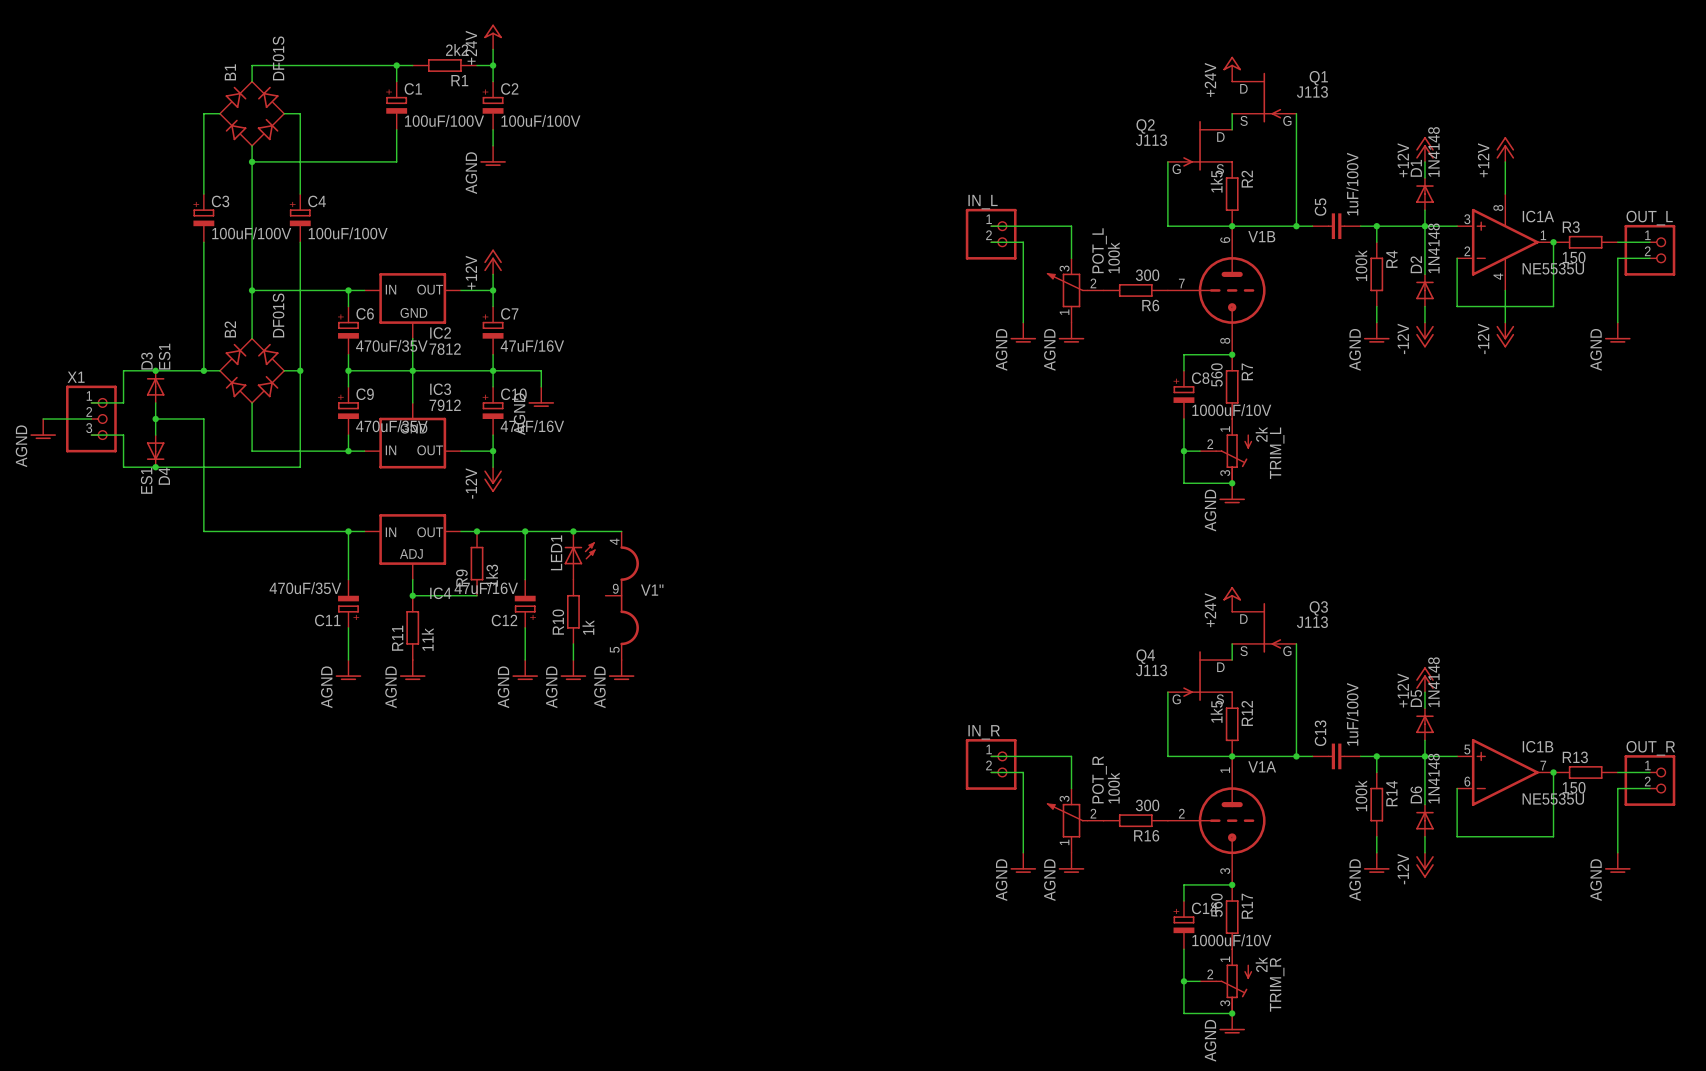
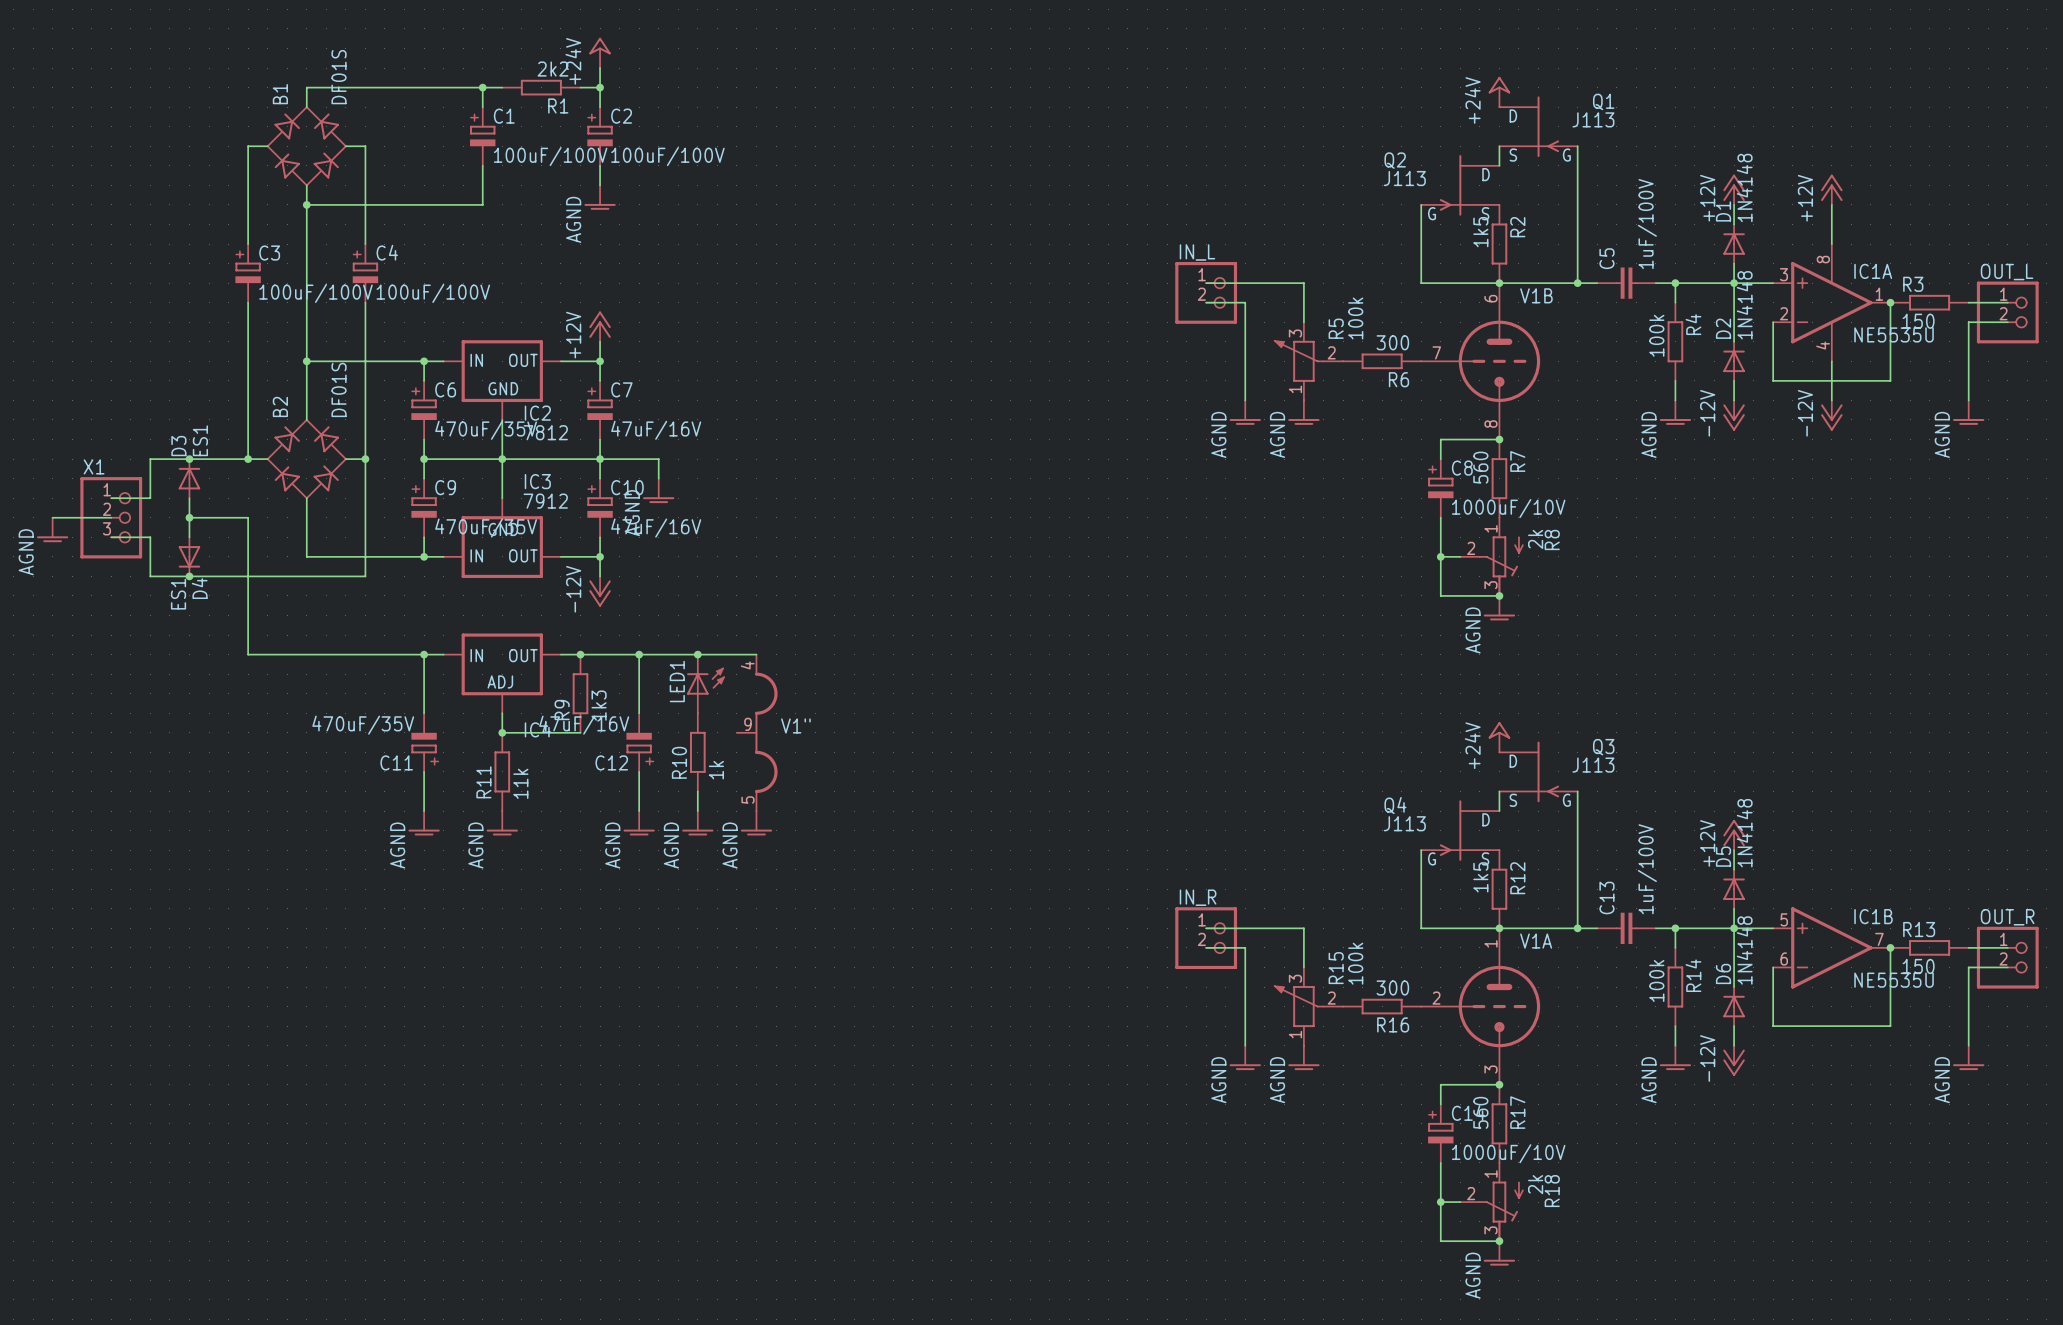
POT_L name: POT_L (1099, 250) -> R5 (1336, 328)
TRIM_L name: TRIM_L (1277, 453) -> R8 (1552, 539)
POT_R name: POT_R (1099, 779) -> R15 (1336, 968)
TRIM_R name: TRIM_R (1277, 984) -> R18 (1552, 1191)

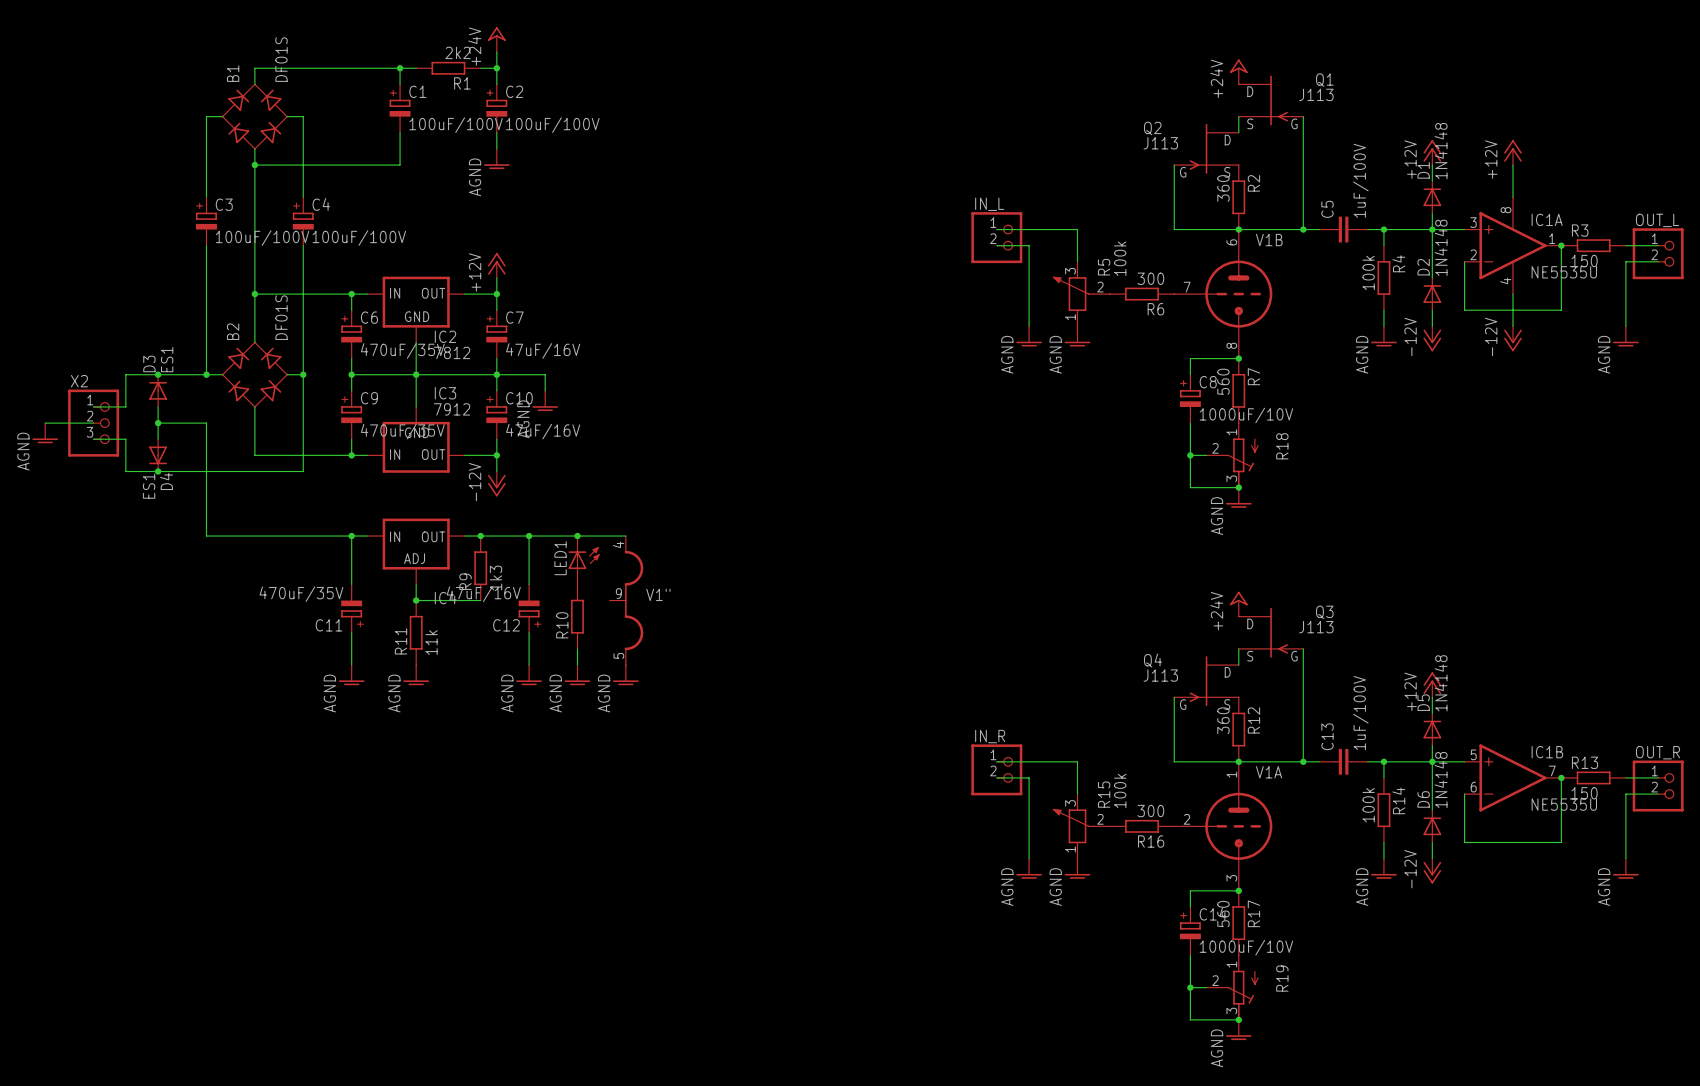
R2 value: 1k5 (1480, 232) -> 360 (1223, 188)
X1 name: X1 (94, 466) -> X2 (79, 381)
R8 value: 2k (1535, 539) -> none
R8 name: R8 (1552, 539) -> R18 (1282, 446)
R10 value: 1k (716, 770) -> none
R12 value: 1k5 (1480, 877) -> 360 (1223, 720)
R18 value: 2k (1535, 1184) -> none
R18 name: R18 (1552, 1191) -> R19 (1282, 978)

